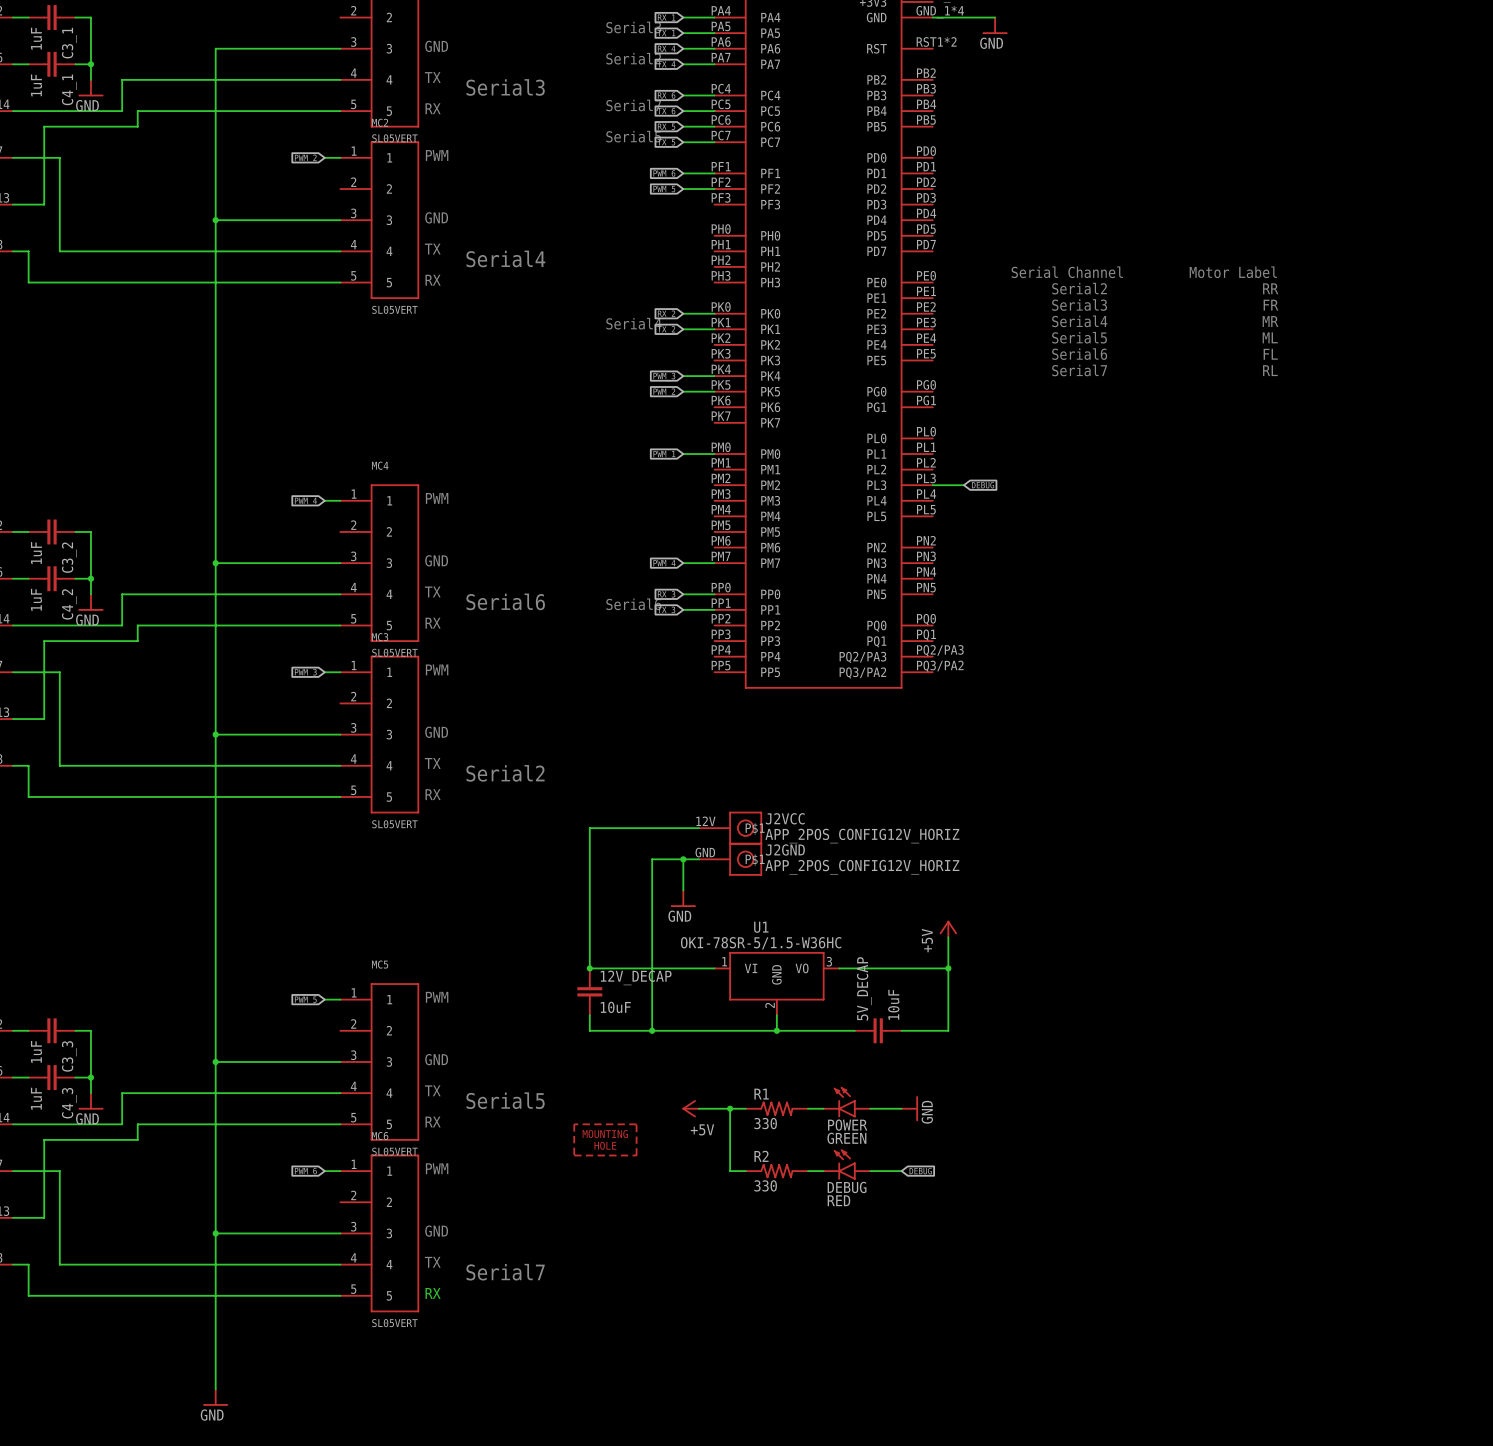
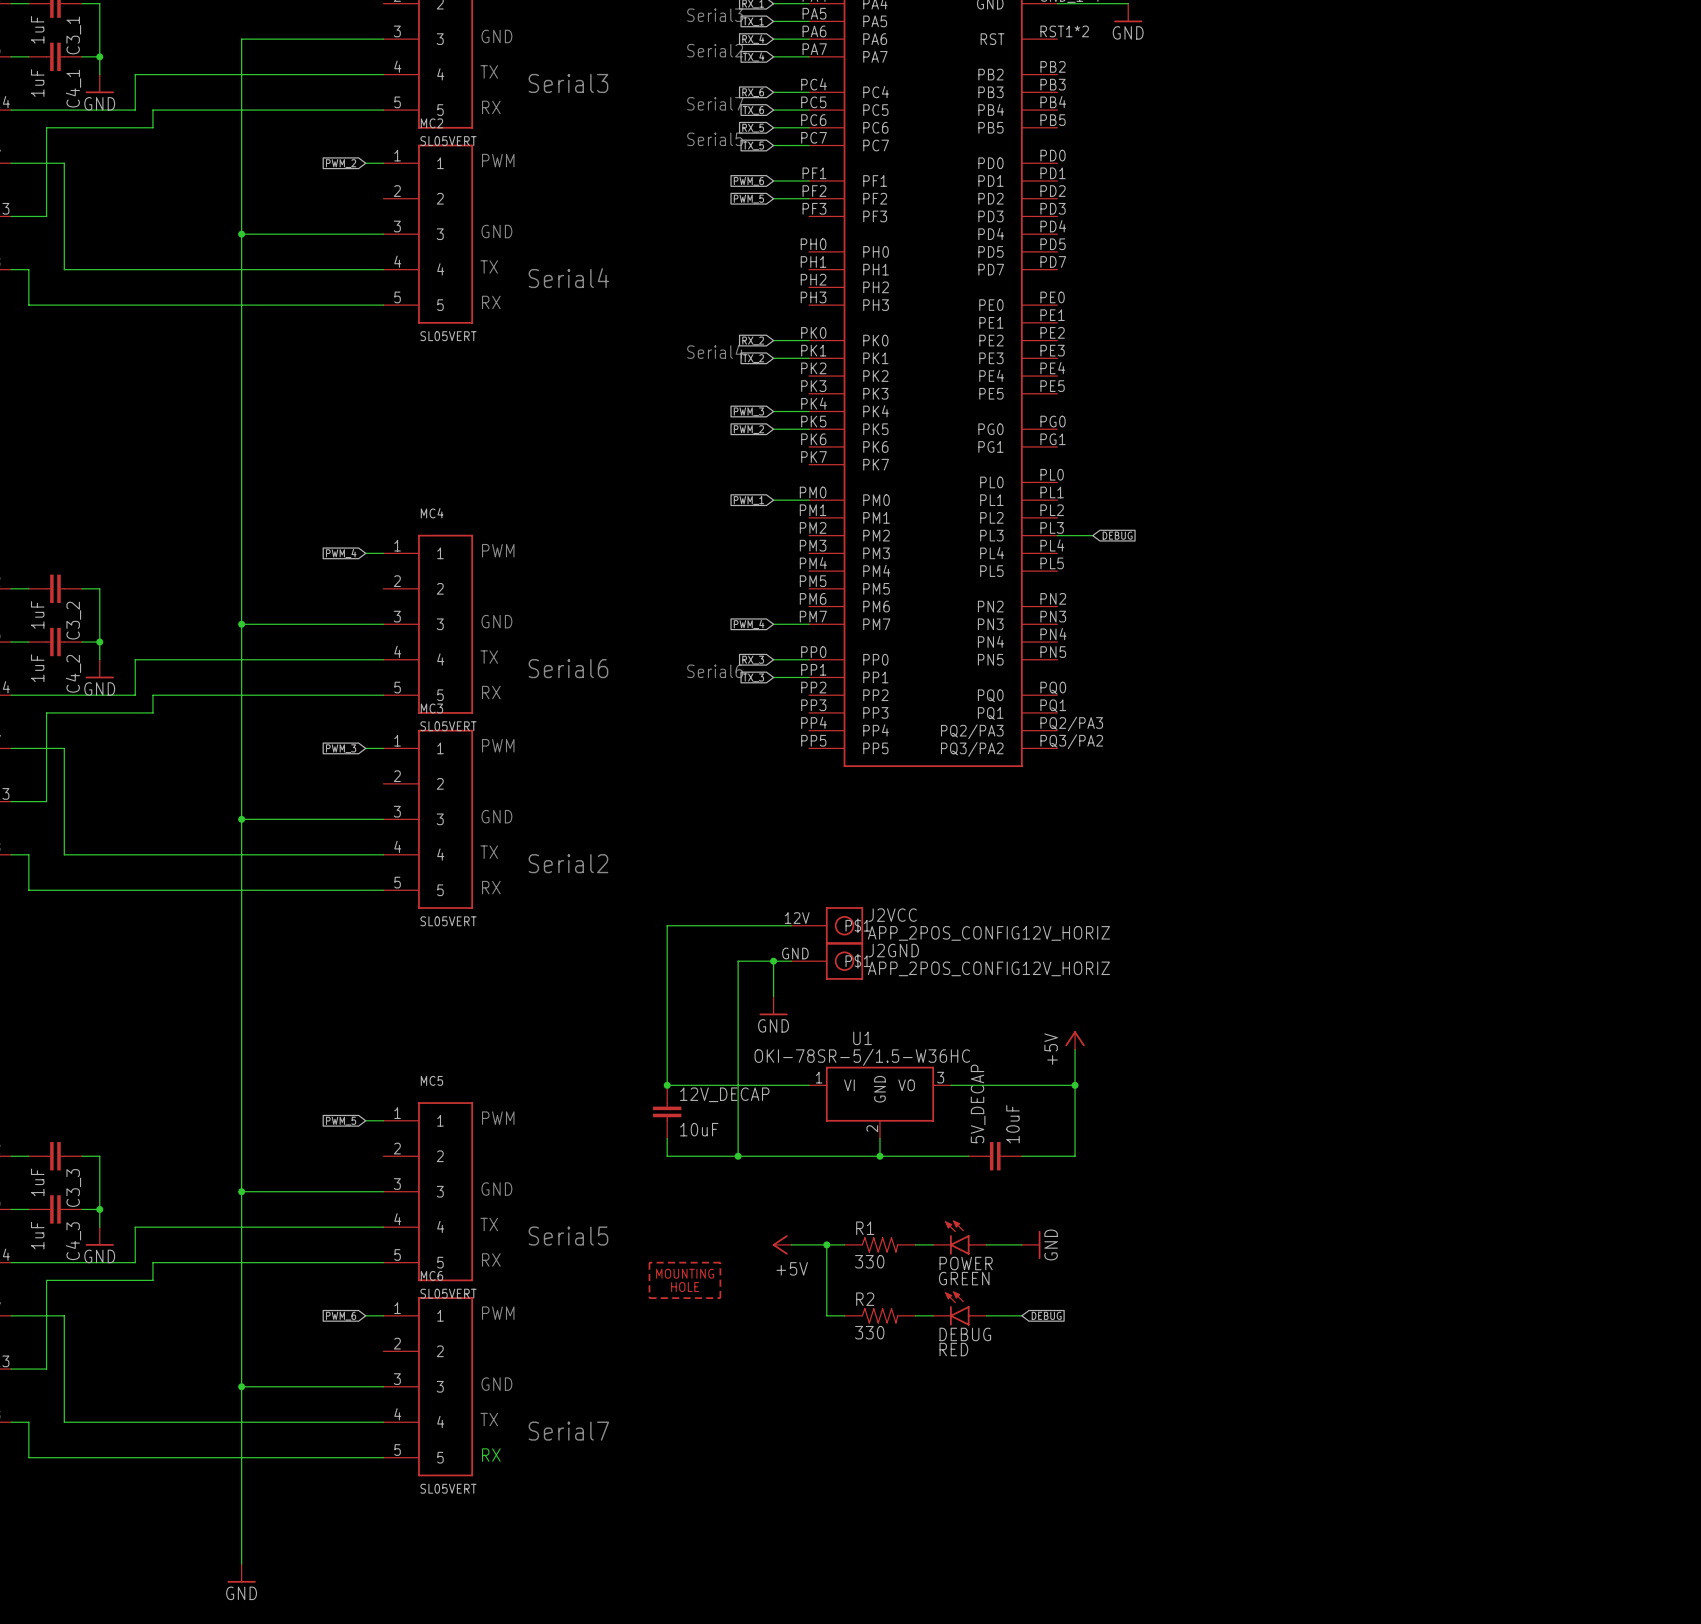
text: Serial Channel Motor Label (1144, 272) -> none
text: Serial2 RR (1165, 288) -> none
text: Serial3 FR (1165, 304) -> none
text: Serial4 MR (1165, 321) -> none
text: Serial5 ML (1164, 337) -> none
text: Serial6 FL (1164, 354) -> none
text: Serial7 RL (1164, 370) -> none

